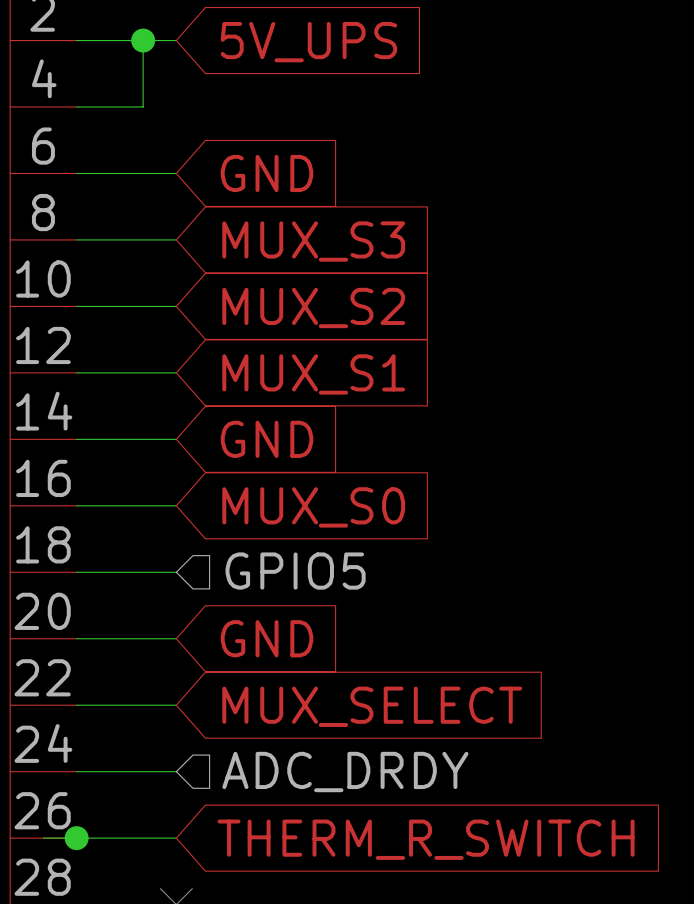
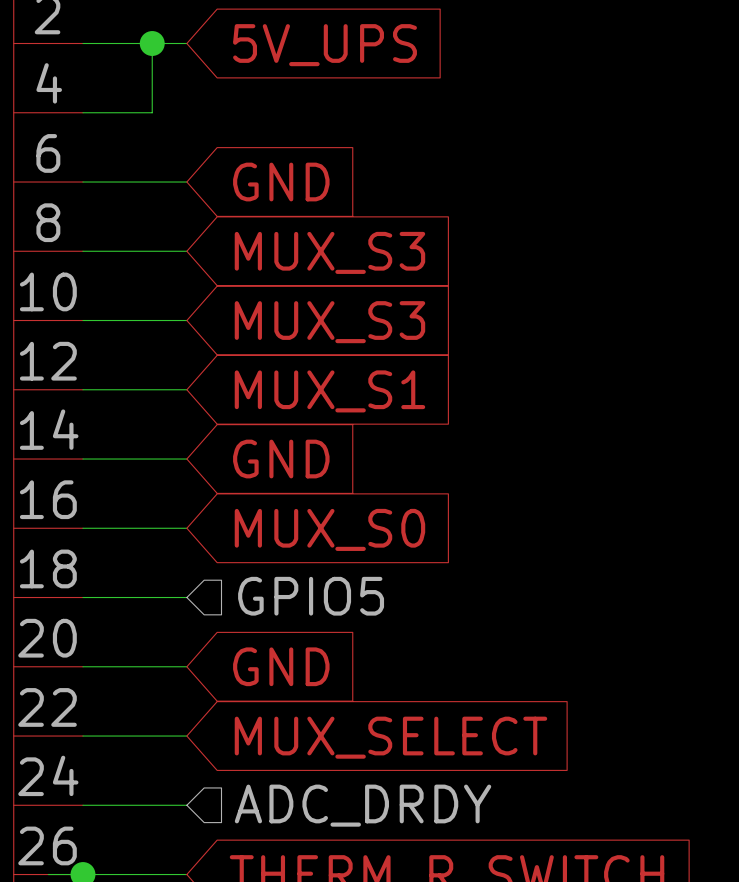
global label: MUX_S2 (313, 307) -> MUX_S3 (329, 322)

